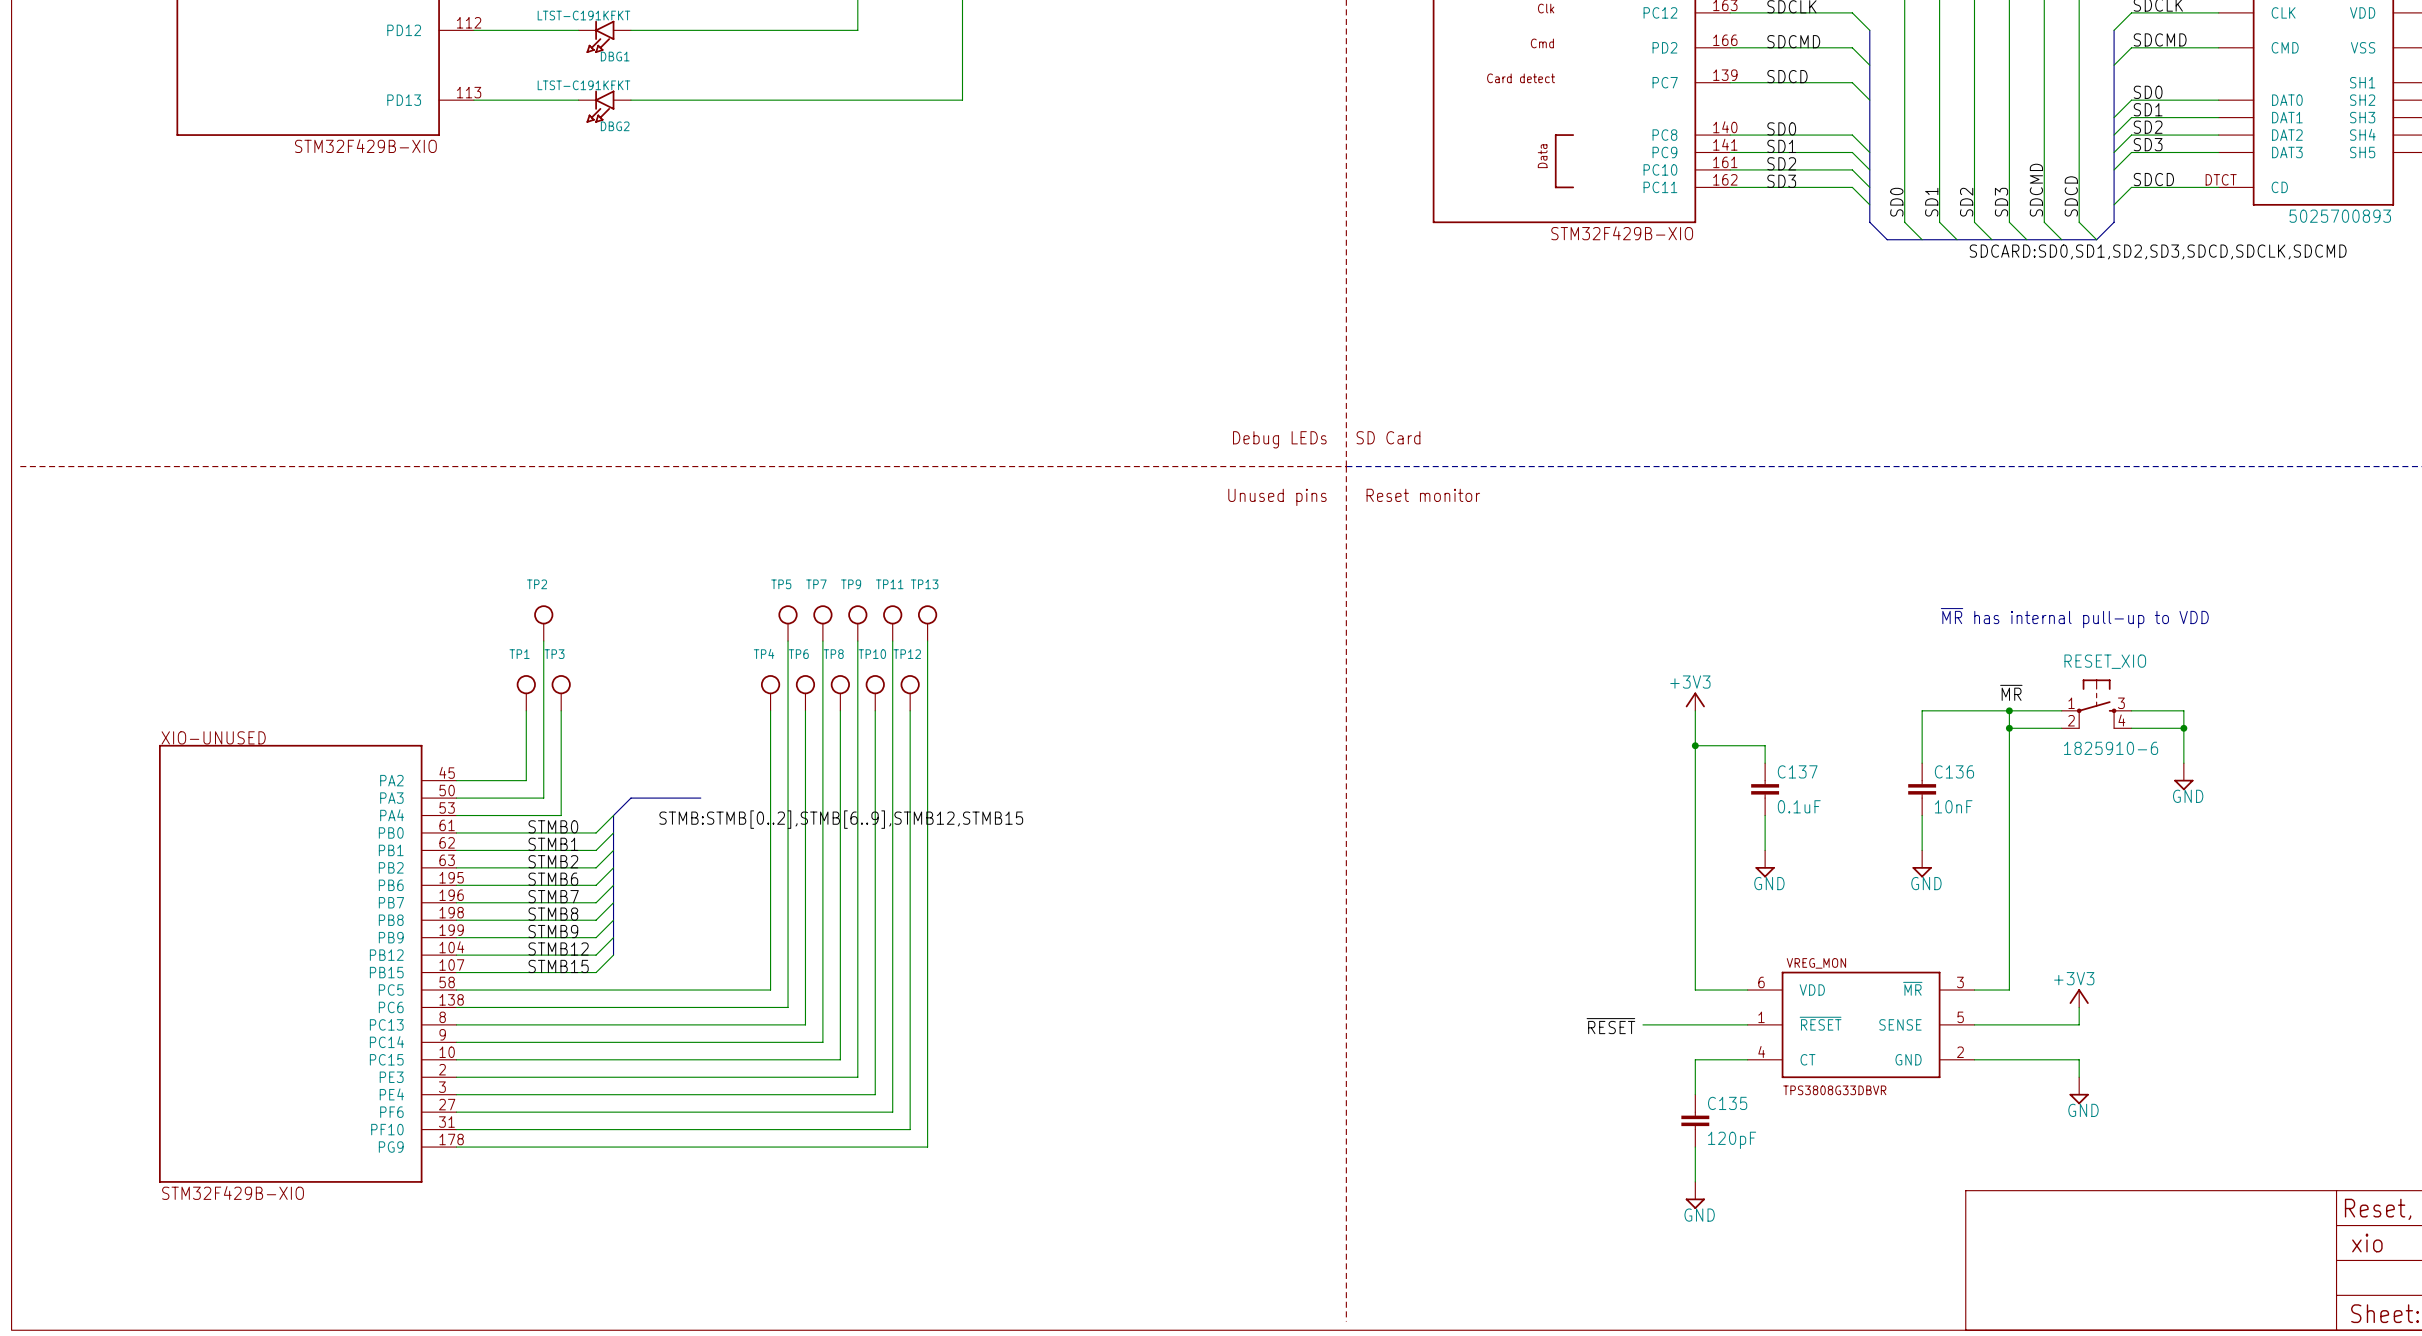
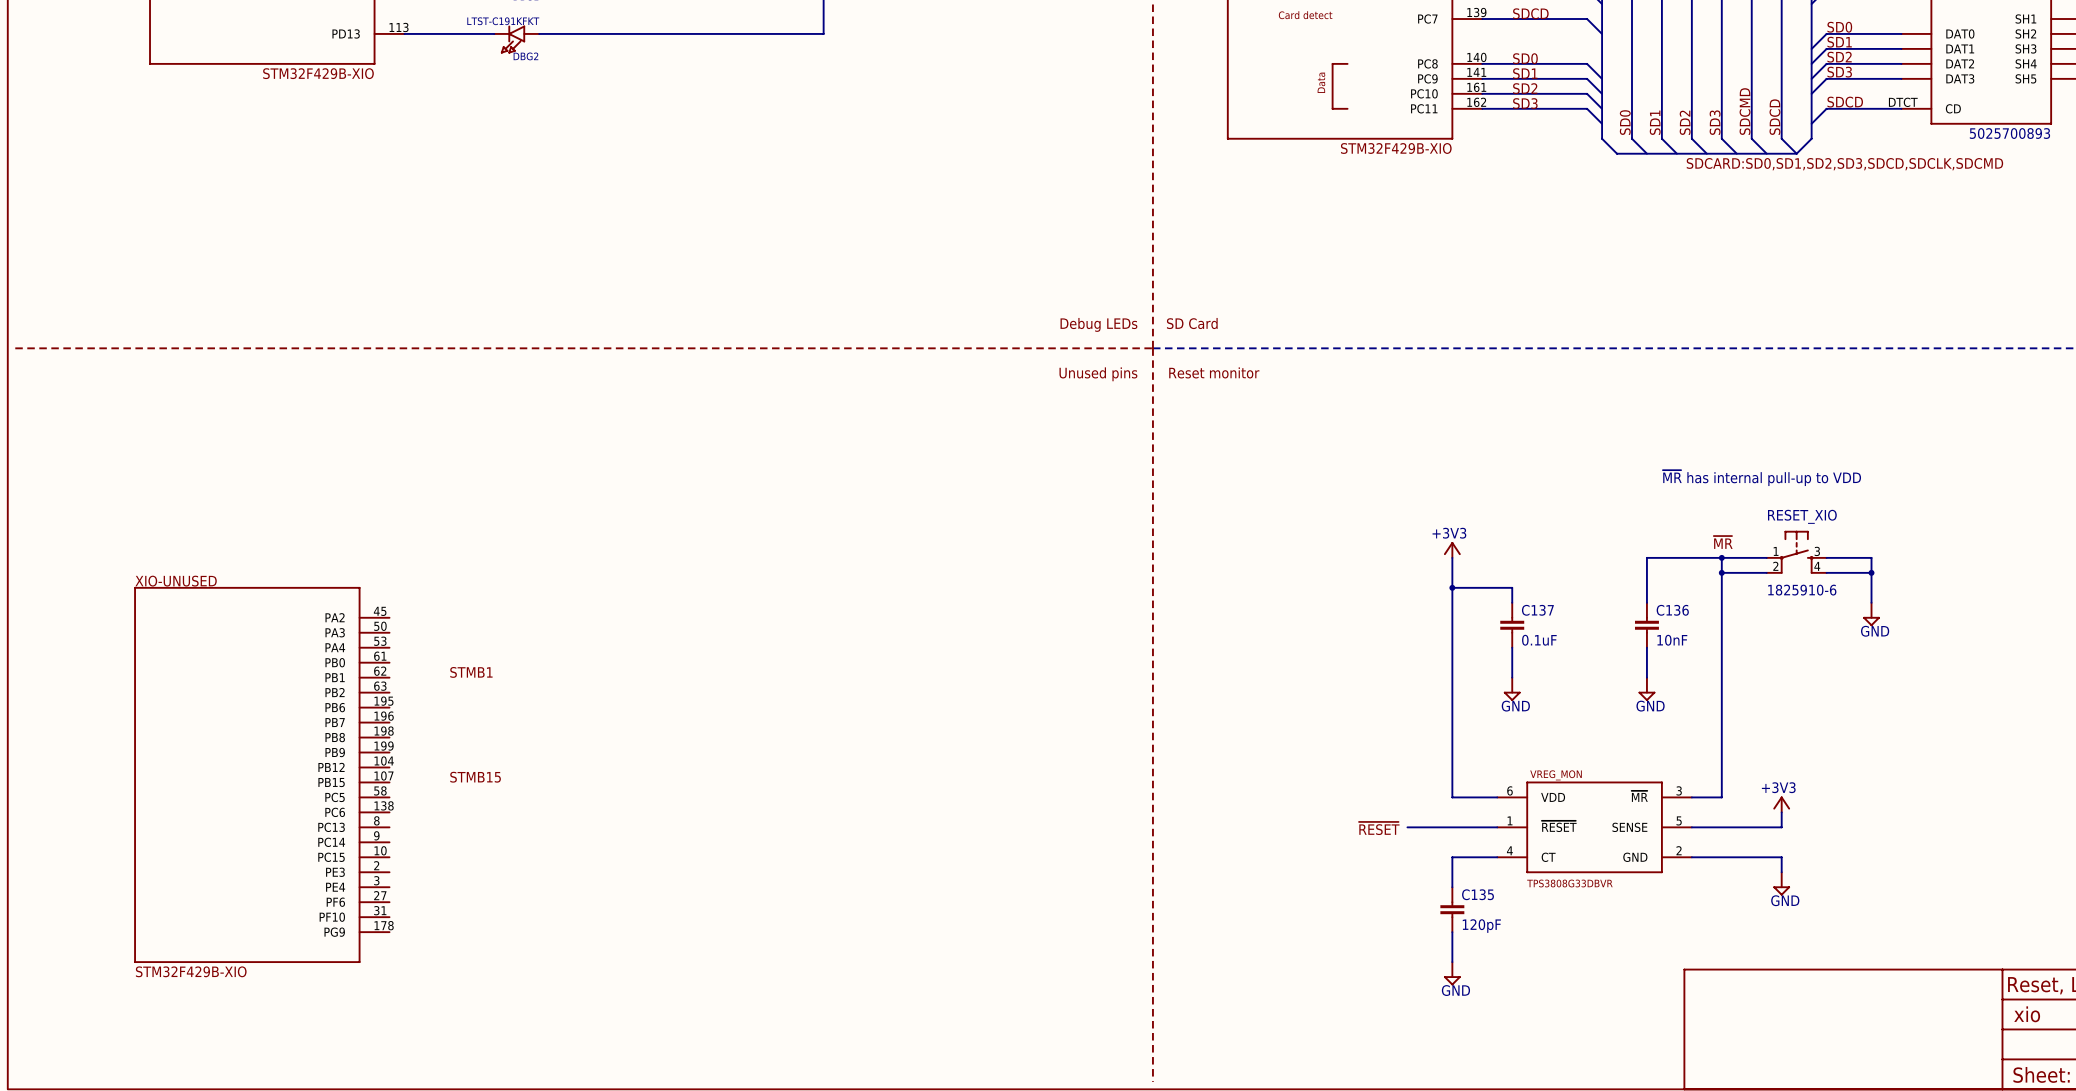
TP2: (543, 623) -> none
TP5: (788, 623) -> none
TP7: (822, 623) -> none
TP9: (857, 623) -> none
TP11: (892, 623) -> none
TP13: (927, 623) -> none
wire: (543, 641) (543, 798) (456, 798) -> none
wire: (788, 641) (788, 1007) (456, 1007) -> none
wire: (822, 641) (822, 1042) (456, 1042) -> none
wire: (857, 641) (857, 1077) (456, 1077) -> none
wire: (892, 641) (892, 1112) (456, 1112) -> none
wire: (927, 641) (927, 1147) (456, 1147) -> none
TP1: (526, 692) -> none
TP3: (561, 692) -> none
TP4: (770, 692) -> none
TP6: (805, 692) -> none
TP8: (840, 692) -> none
TP10: (875, 692) -> none
TP12: (910, 692) -> none
wire: (526, 710) (526, 780) (456, 780) -> none
wire: (561, 710) (561, 815) (456, 815) -> none
wire: (770, 710) (770, 990) (456, 990) -> none
wire: (805, 710) (805, 1024) (456, 1024) -> none
wire: (840, 710) (840, 1059) (456, 1059) -> none
wire: (875, 710) (875, 1094) (456, 1094) -> none
wire: (910, 710) (910, 1129) (456, 1129) -> none
bus: (700, 798) (630, 798) (613, 815) (613, 955) -> none
wire: (613, 815) (596, 832) (456, 832) -> none
label: STMB:STMB[0..2],STMB[6..9],STMB12,STMB15 (841, 819) -> none
label: STMB0 (553, 826) -> none
wire: (613, 832) (596, 850) (456, 850) -> none
wire: (613, 850) (596, 867) (456, 867) -> none
label: STMB2 (553, 861) -> none
wire: (613, 867) (596, 885) (456, 885) -> none
label: STMB6 (553, 879) -> none
wire: (613, 885) (596, 902) (456, 902) -> none
label: STMB7 (553, 896) -> none
wire: (613, 902) (596, 920) (456, 920) -> none
label: STMB8 (553, 914) -> none
wire: (613, 920) (596, 937) (456, 937) -> none
label: STMB9 (553, 931) -> none
wire: (613, 937) (596, 955) (456, 955) -> none
label: STMB12 (558, 949) -> none
wire: (613, 955) (596, 972) (456, 972) -> none

